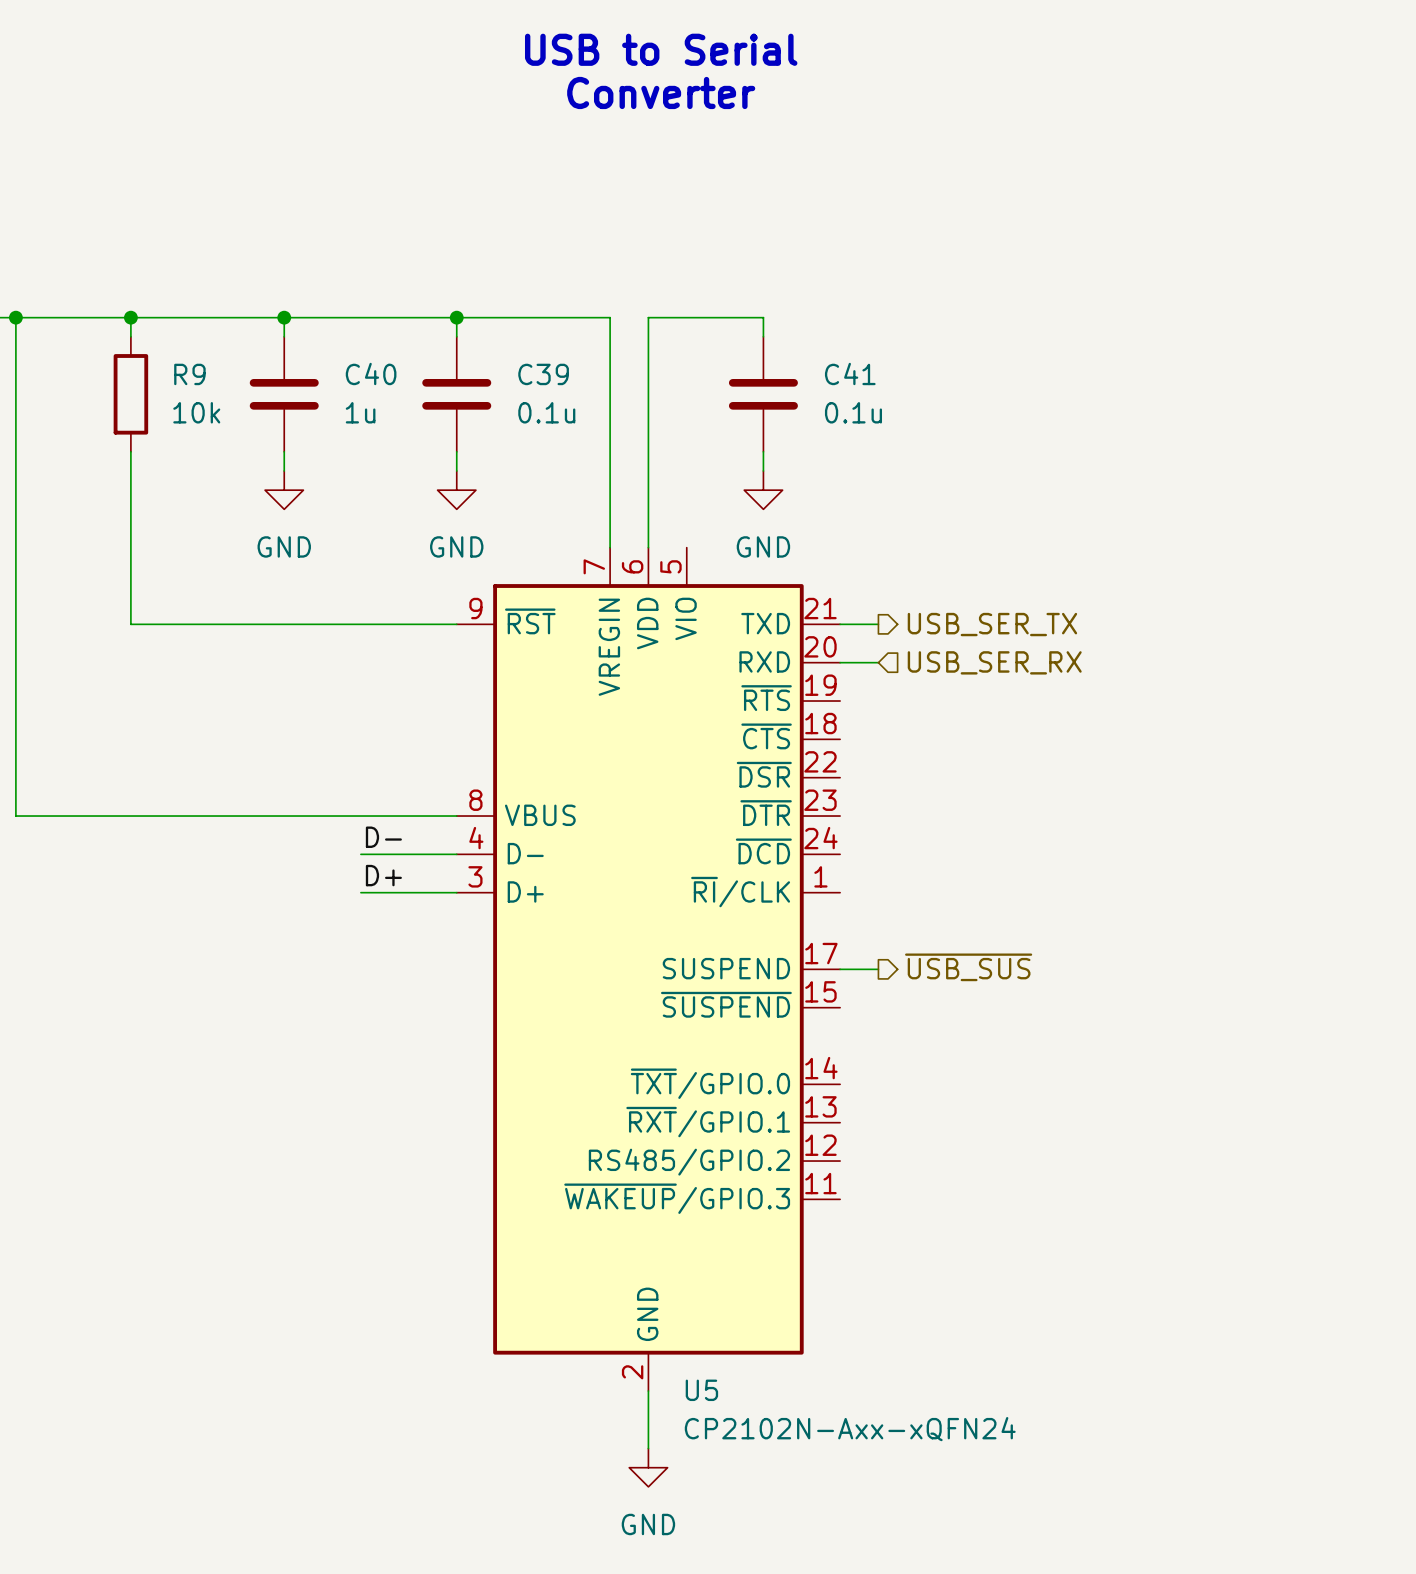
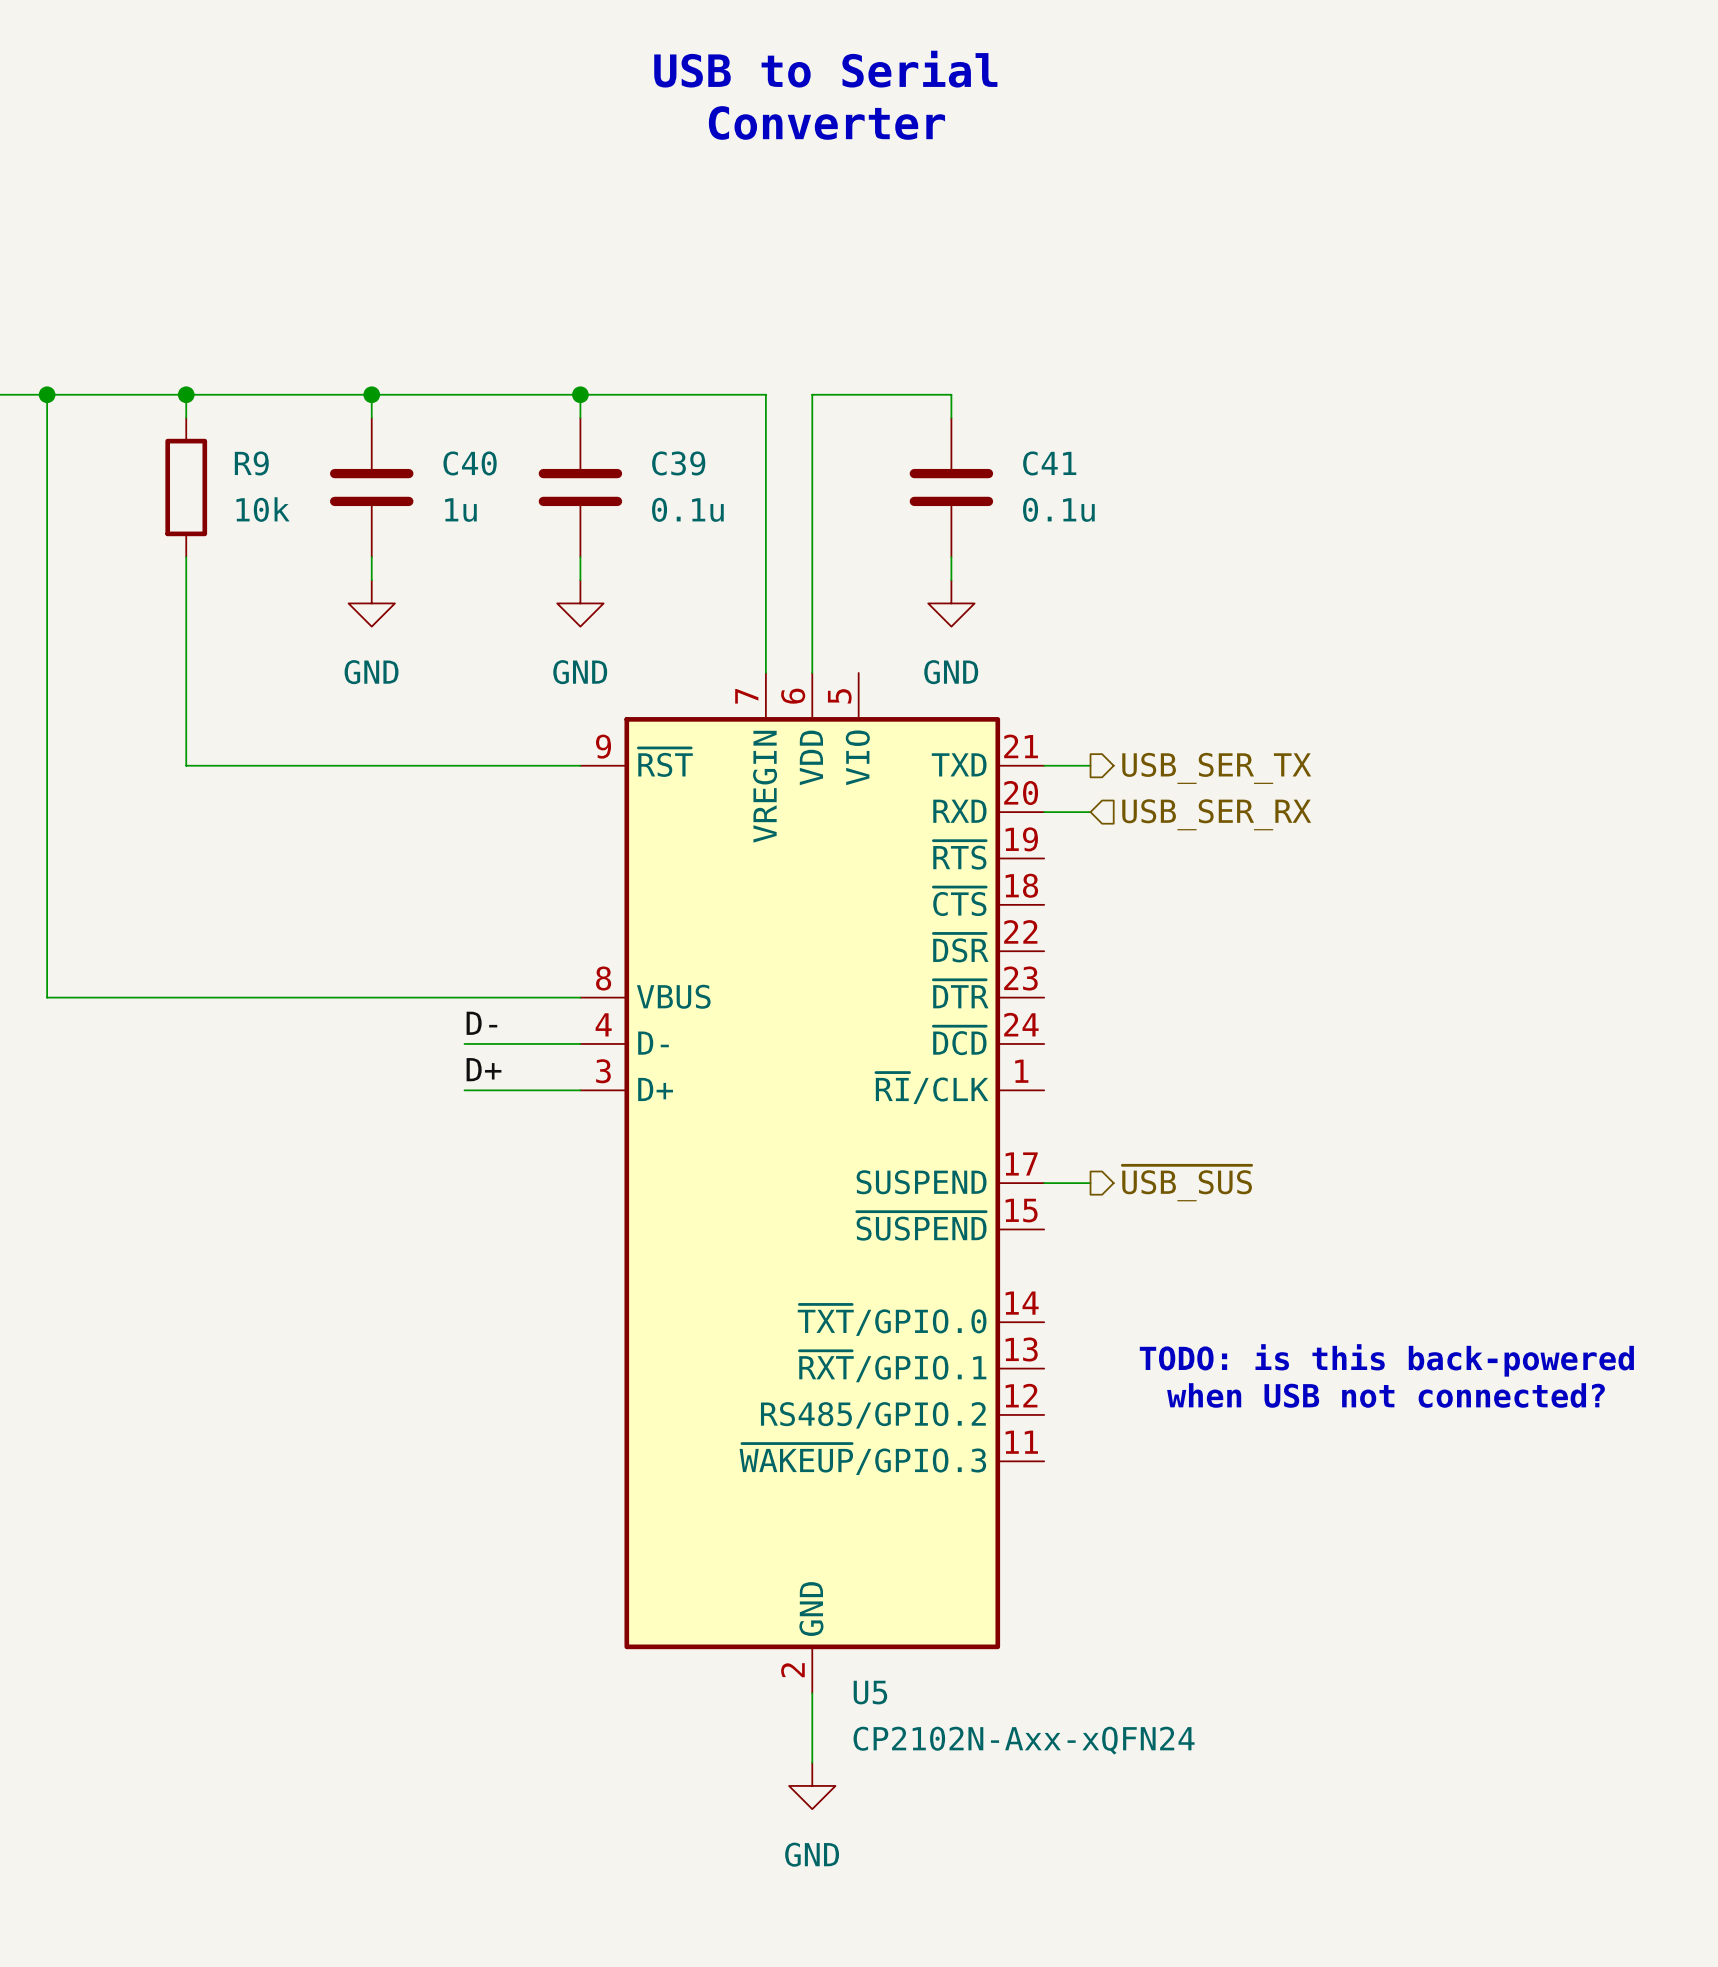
text: none -> TODO: is this back-powered (1386, 1360)
text: none -> when USB not connected? (1386, 1395)

